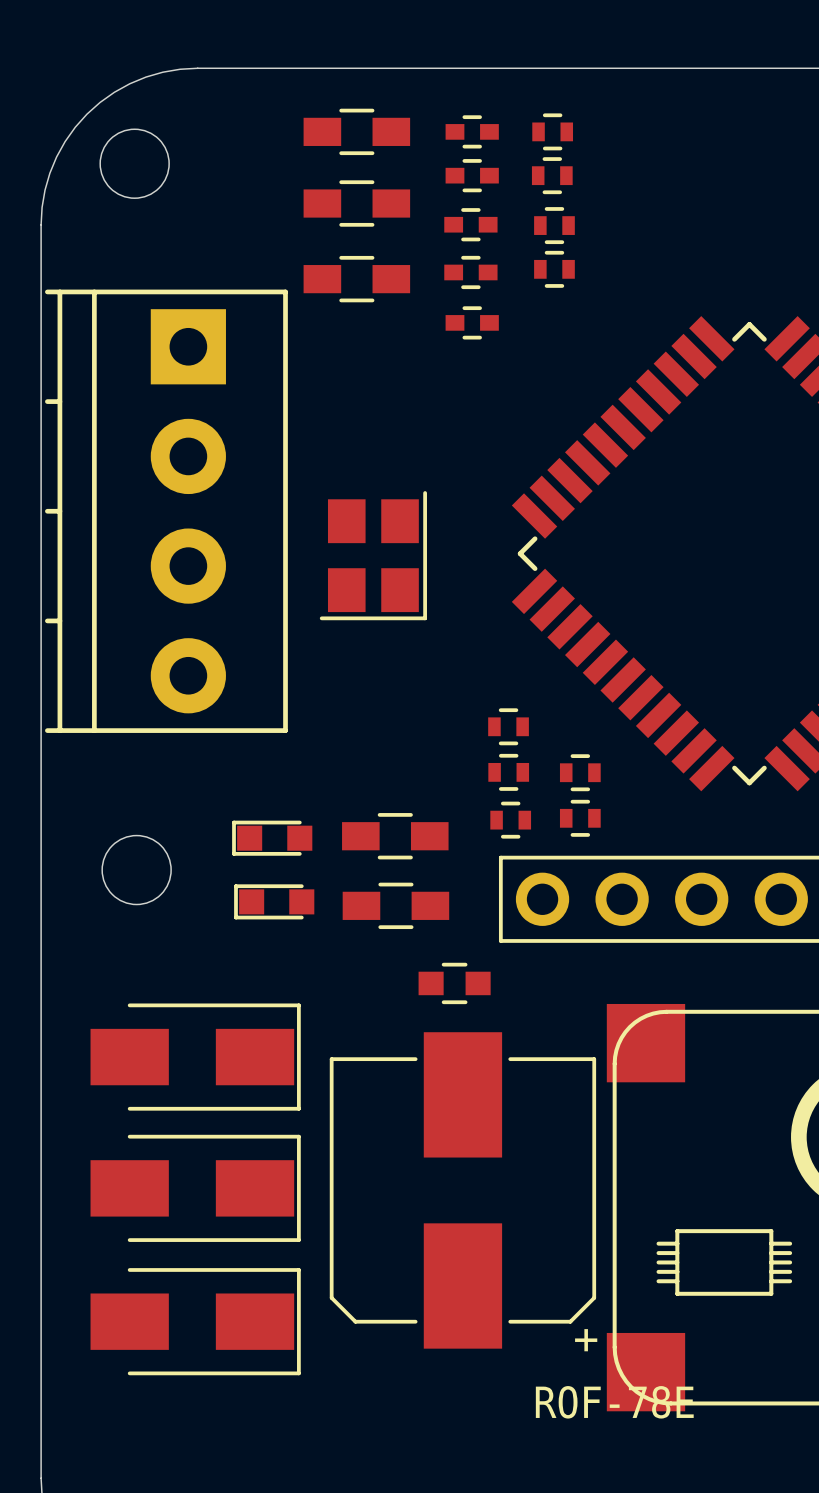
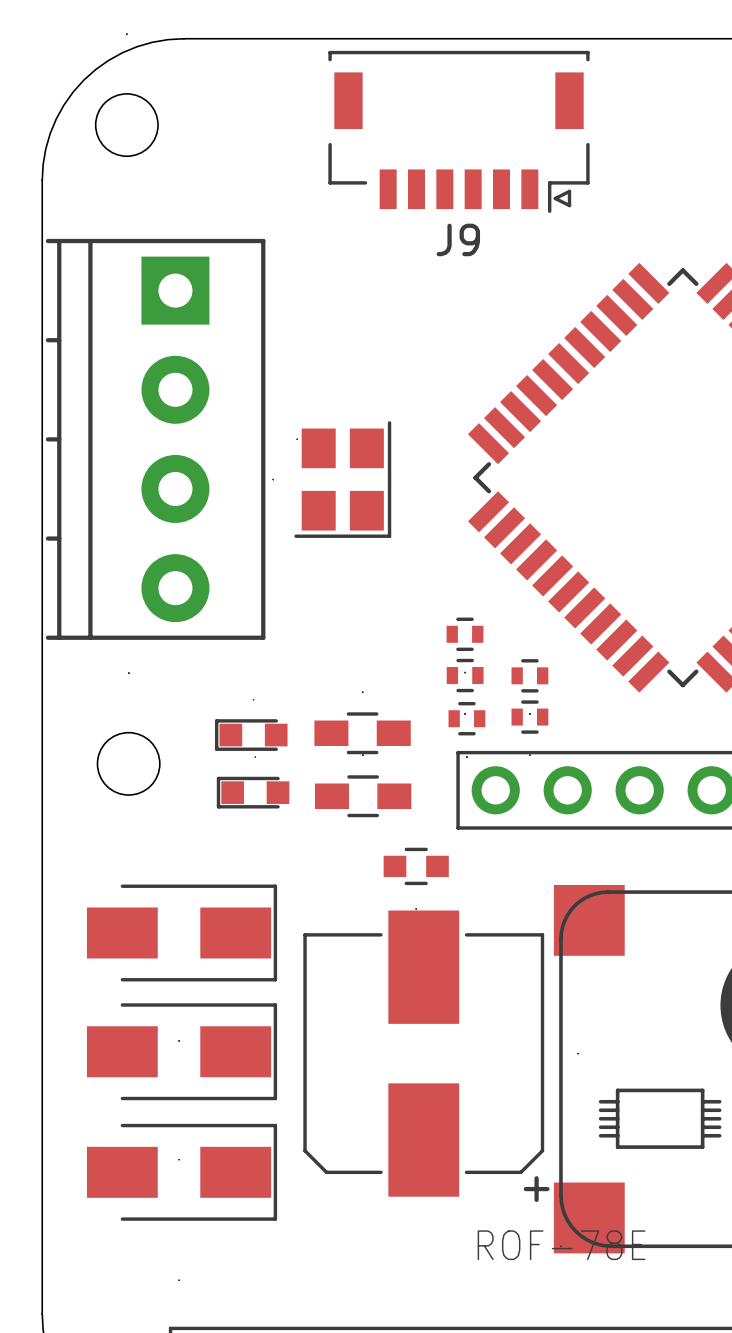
part: (356, 131) -> none
part: (472, 131) -> none
part: (552, 131) -> none
J9: none -> (458, 131)
part: (472, 175) -> none
part: (552, 175) -> none
part: (356, 203) -> none
part: (470, 224) -> none
part: (554, 225) -> none
part: (554, 269) -> none
part: (470, 272) -> none
part: (356, 279) -> none
part: (472, 322) -> none

